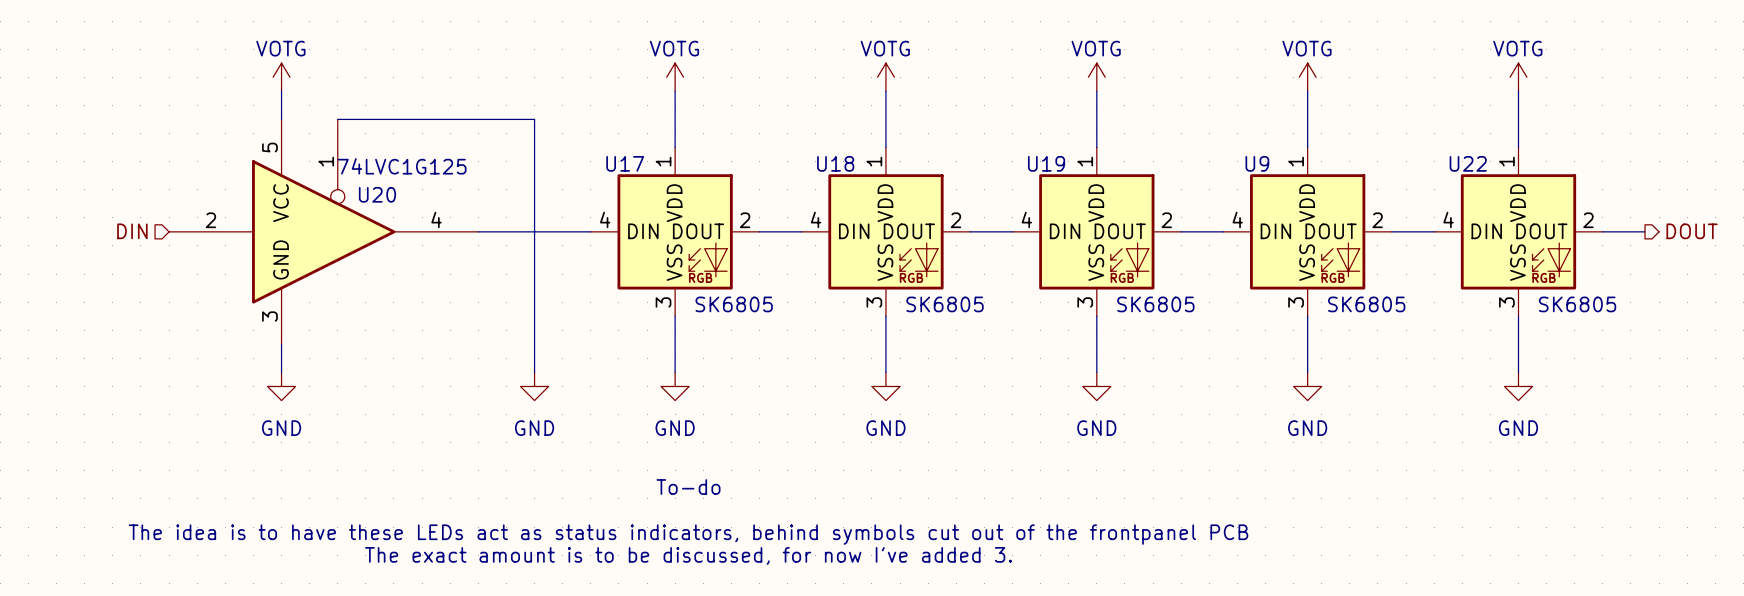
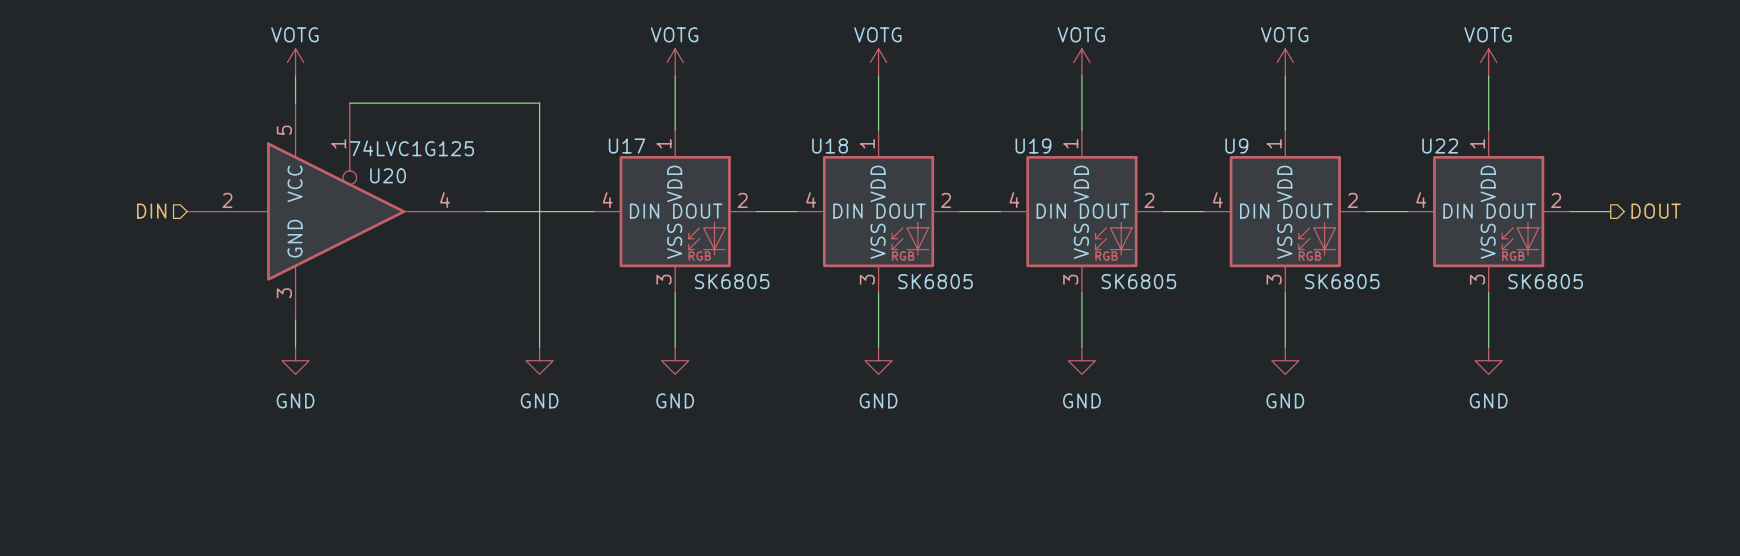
text: To-do (688, 486) -> none
text: The idea is to have these LEDs act as status indicators, behind symbols cut out of the frontpanel PCB (688, 534) -> none
text: The exact amount is to be discussed, for now I've added 3. (688, 555) -> none

